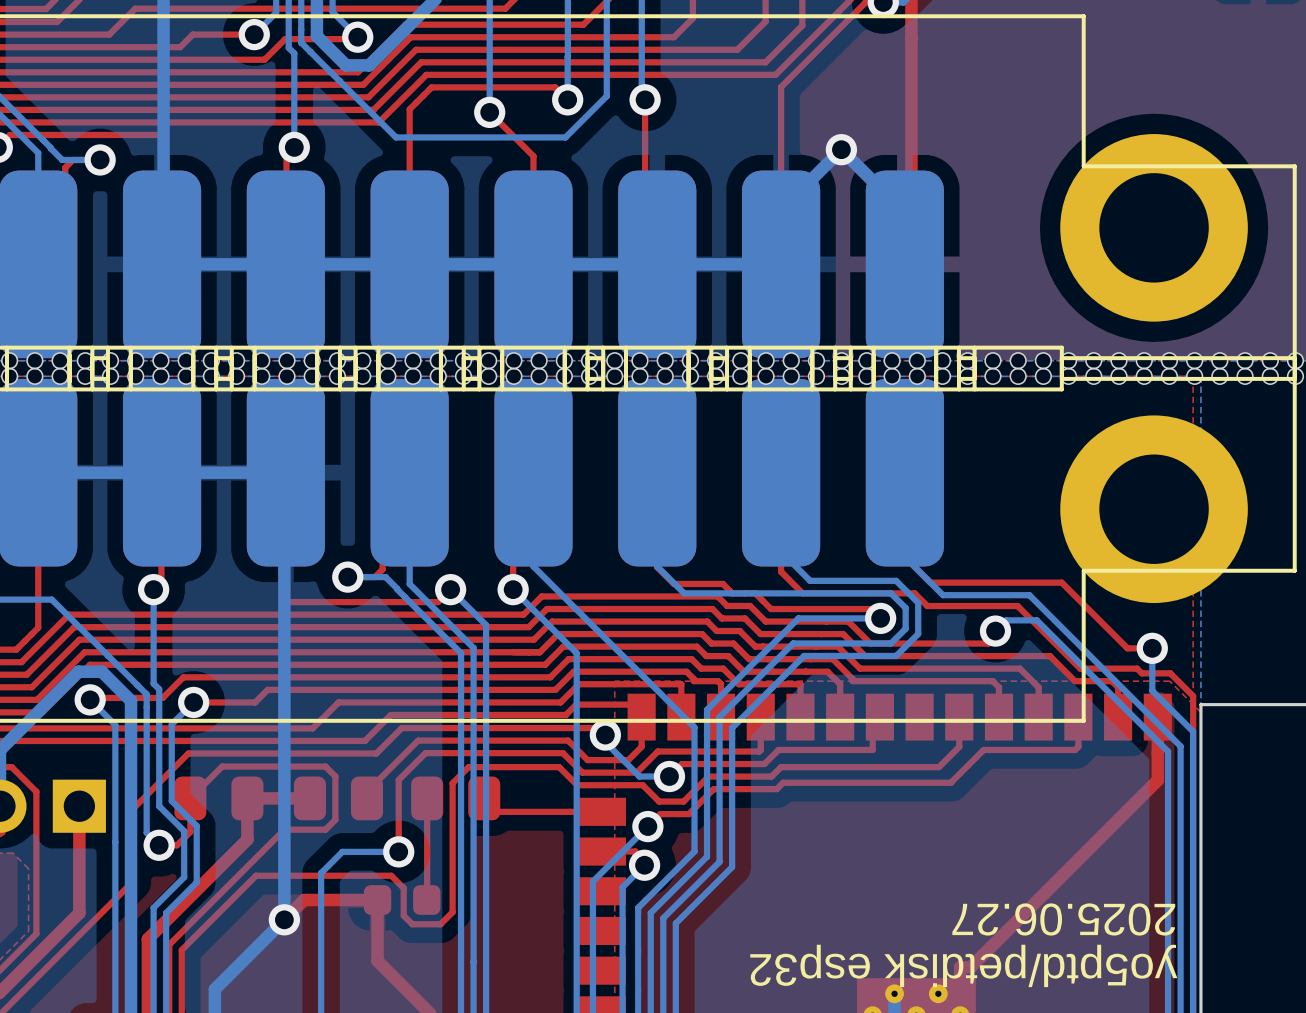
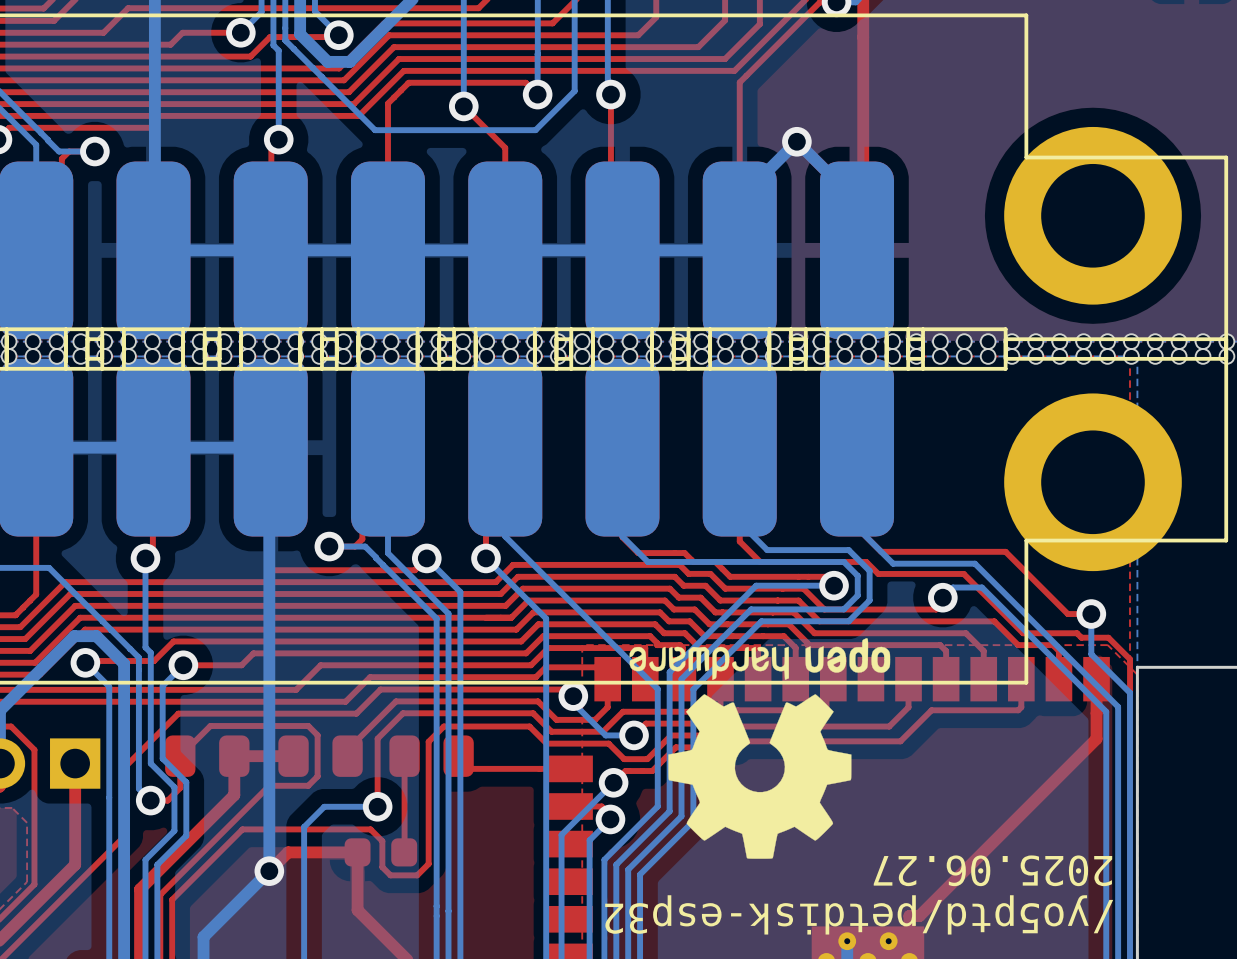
drawing: none -> [629, 638, 891, 859]
text: yo5ptd/petdisk esp32 (963, 965) -> /yo5ptd/petdisk-esp32 (859, 914)

